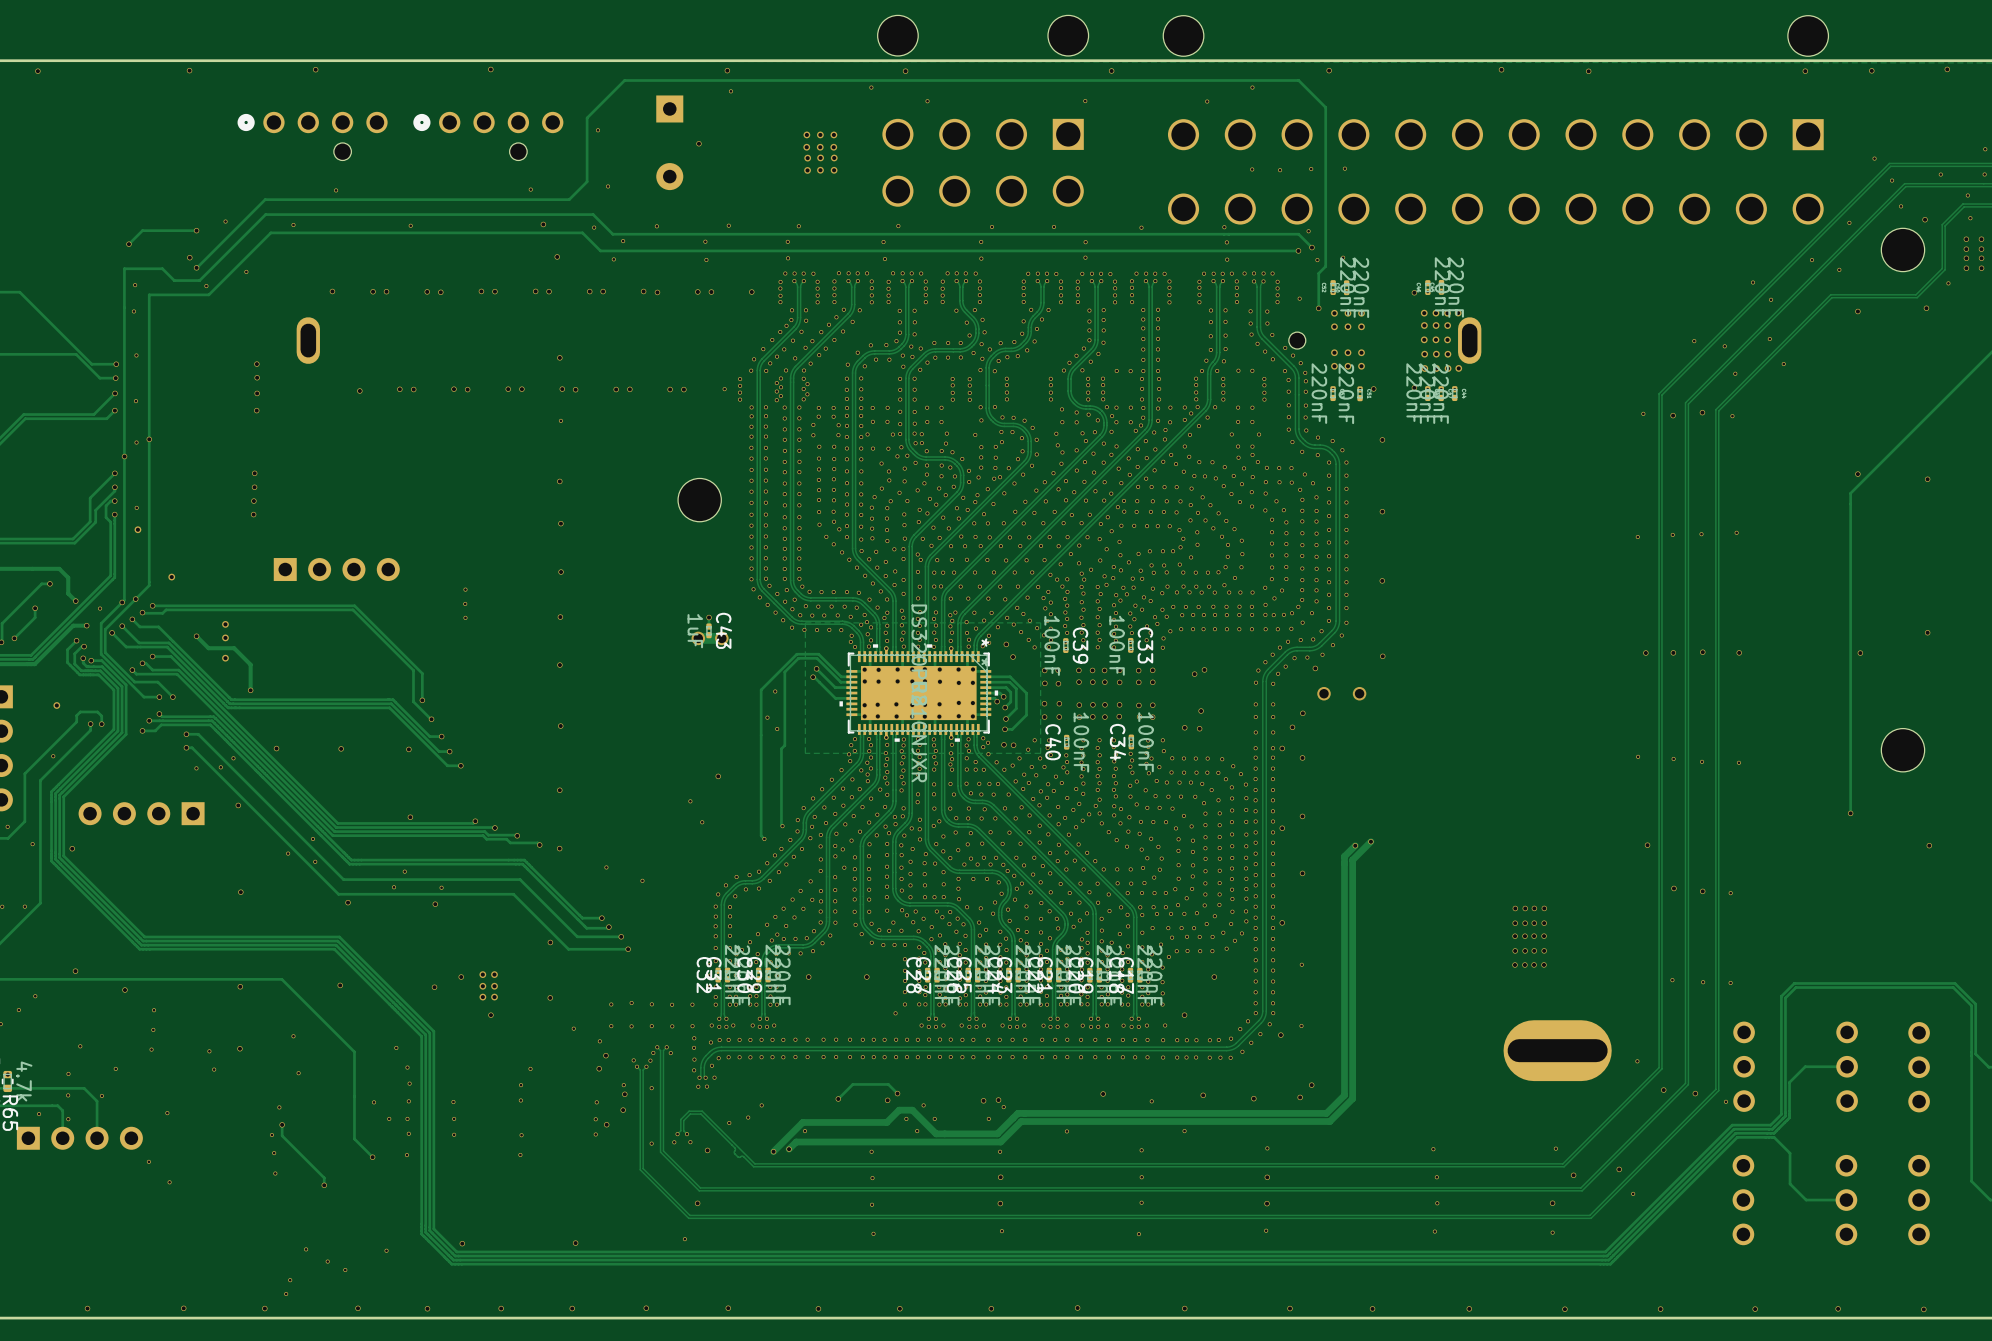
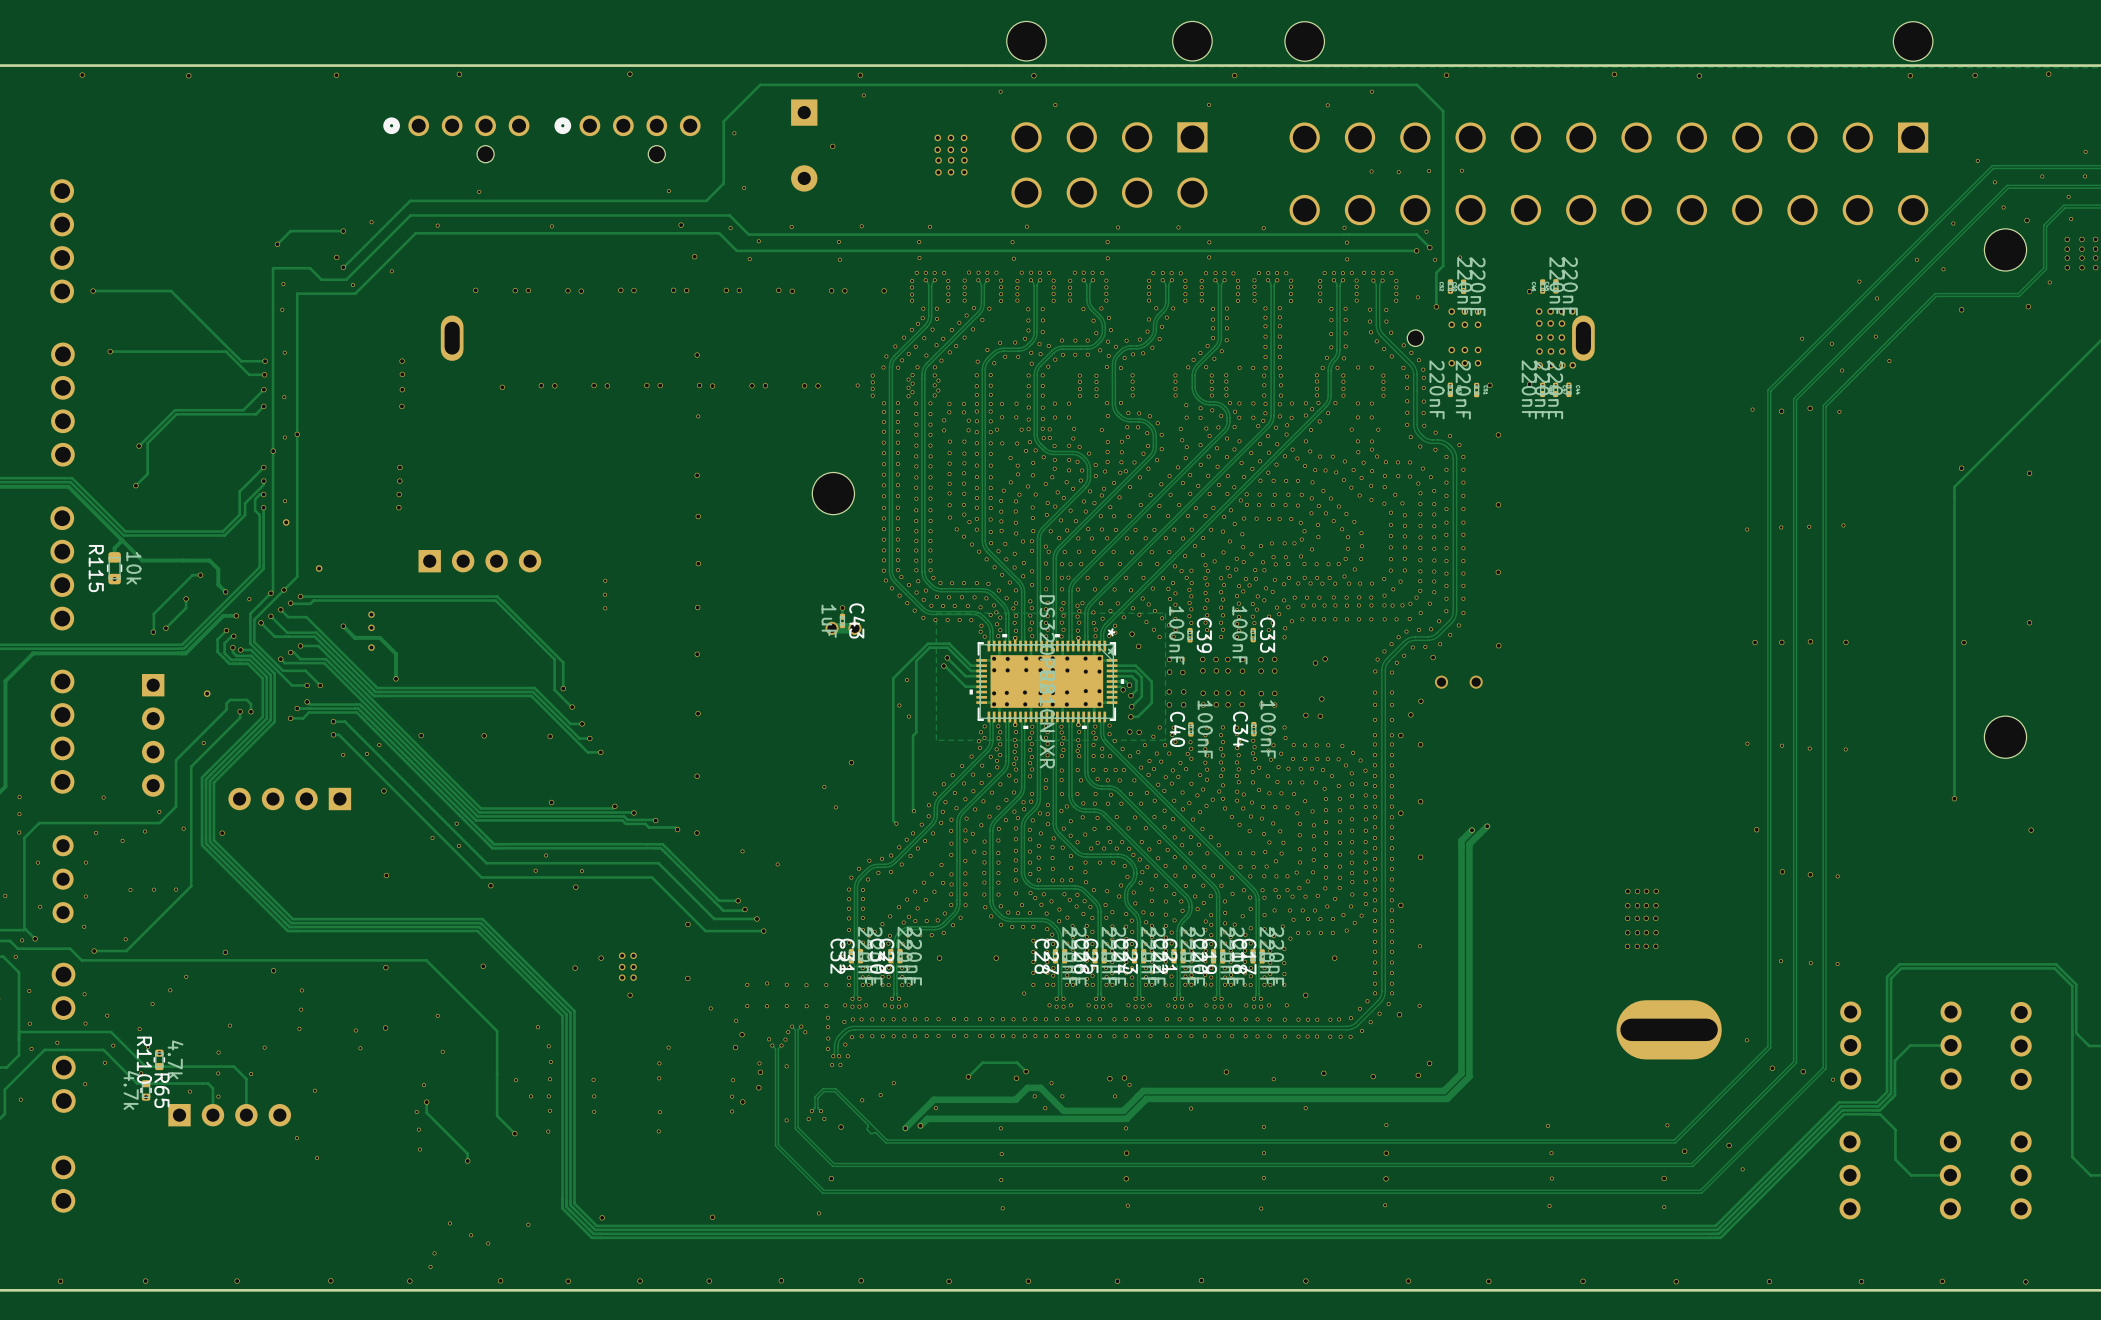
via: (988, 742) -> none

